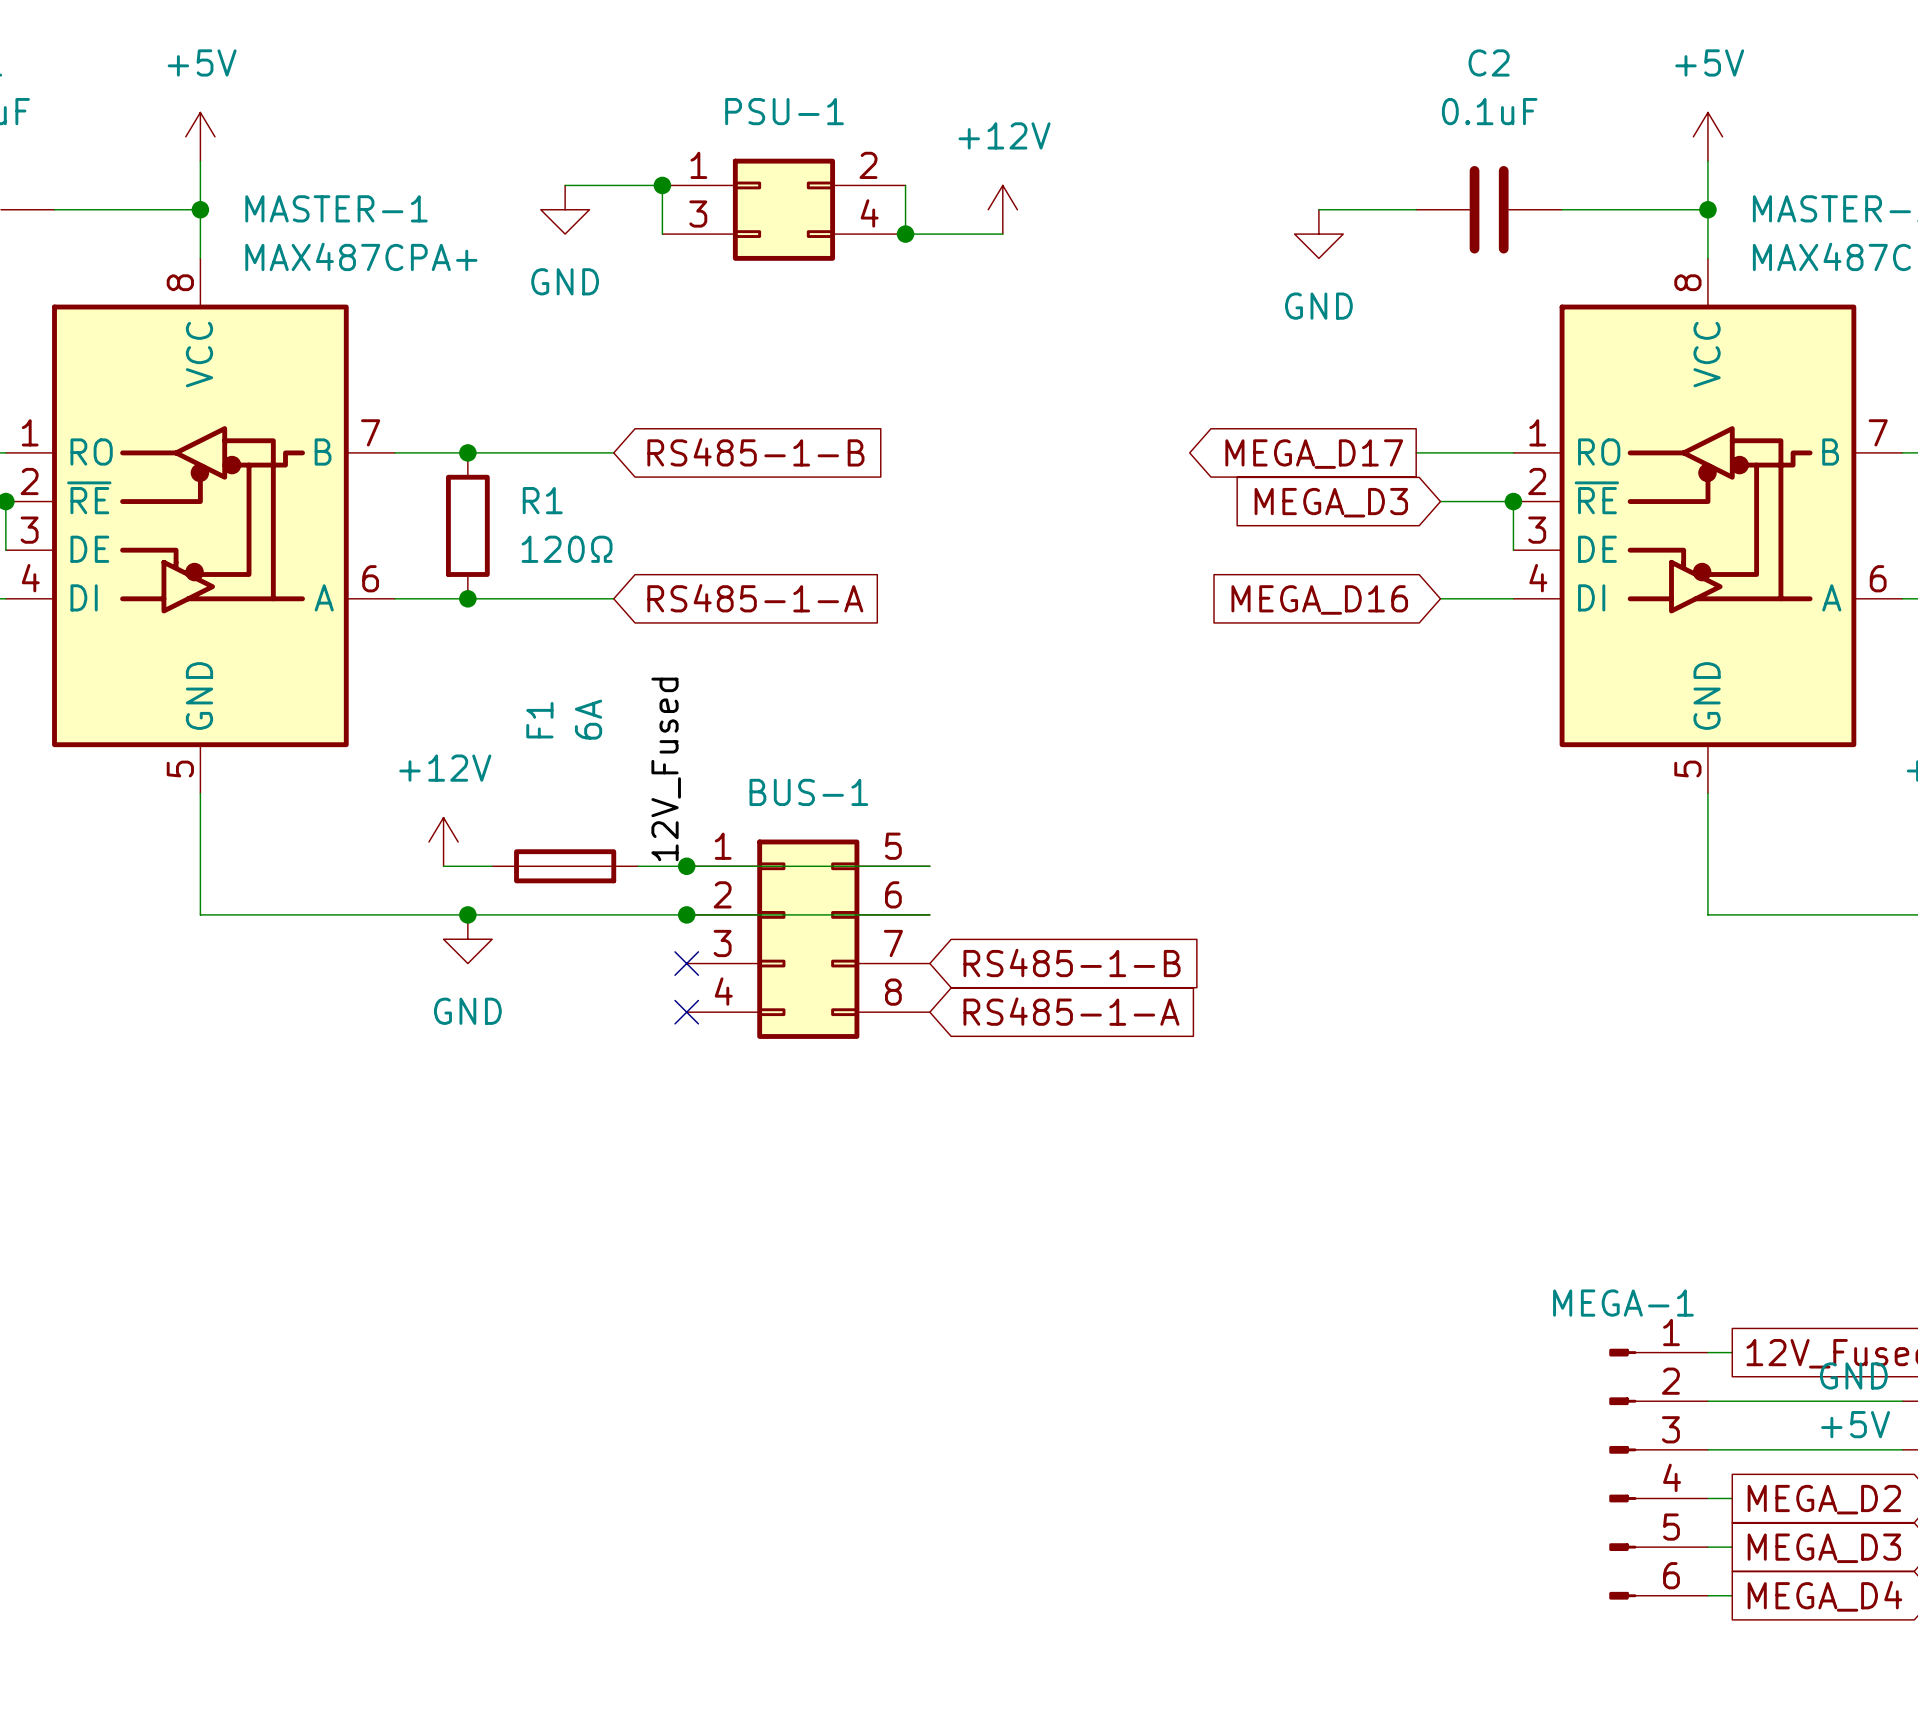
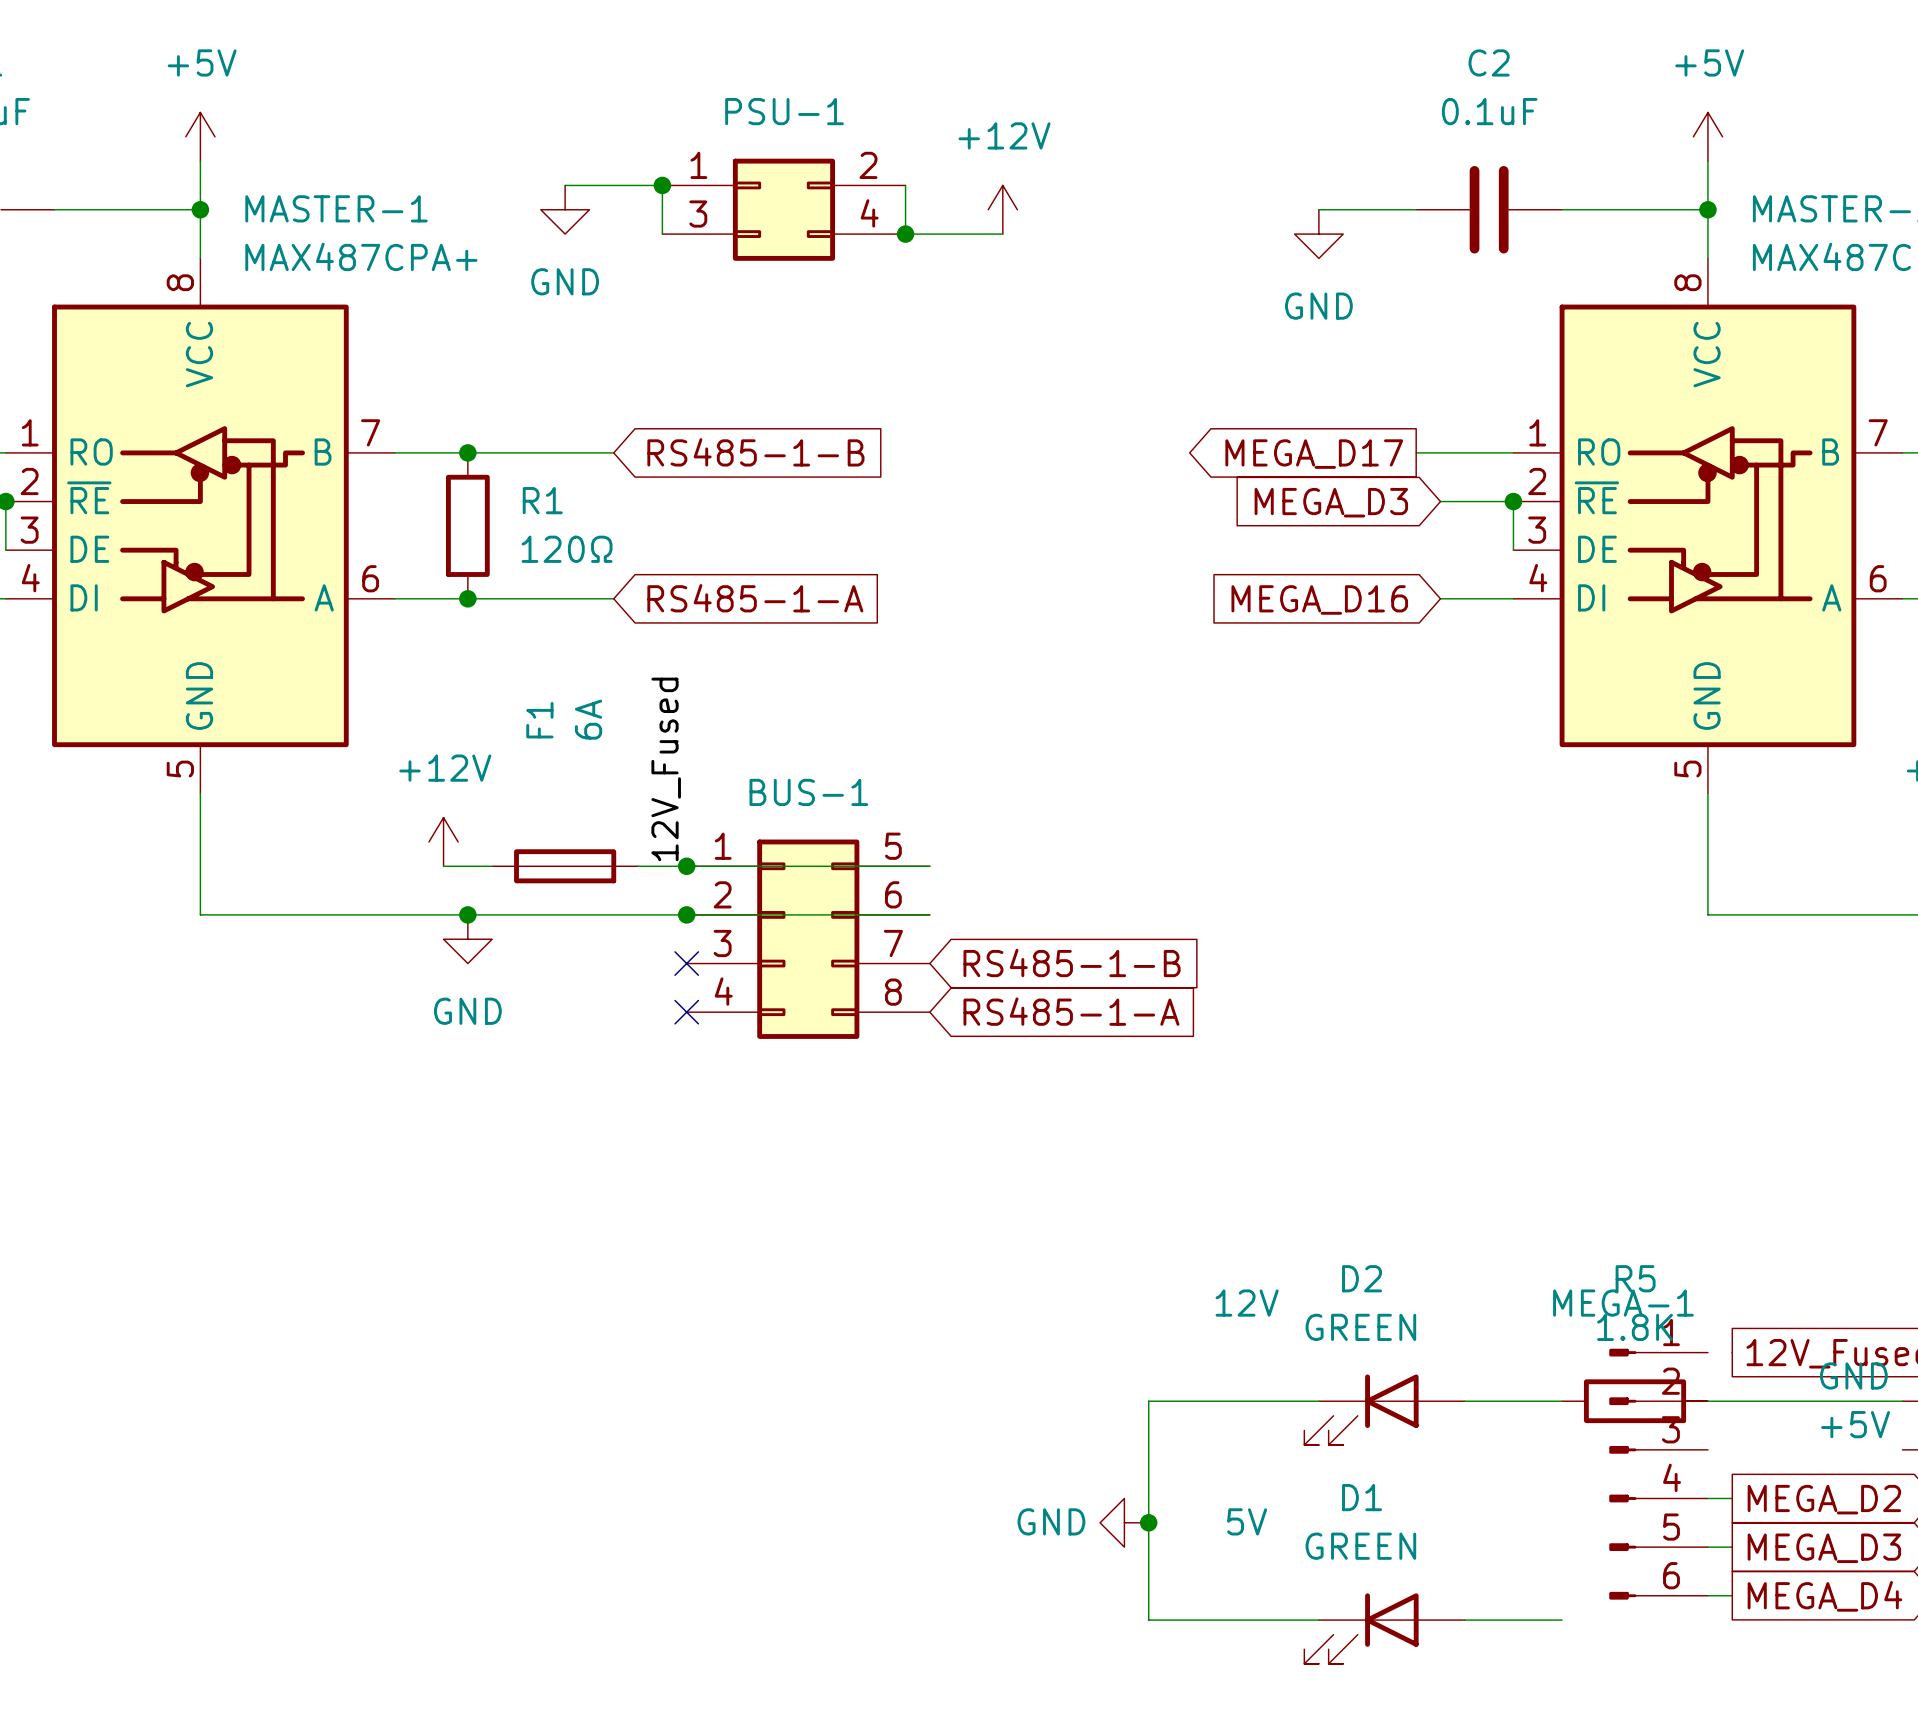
wire: (1707, 1352) (1732, 1352) -> none
wire: none -> (1318, 1401) (1148, 1401) (1148, 1620) (1318, 1620)
wire: none -> (1464, 1401) (1562, 1401)
R5: none -> 1.8K (1635, 1401)
D2: none -> GREEN (1384, 1409)
wire: (1707, 1449) (1902, 1449) -> none
power symbol: none -> GND (1124, 1522)
junction: none -> (1148, 1522)
wire: none -> (1464, 1620) (1562, 1620)
D1: none -> GREEN (1384, 1628)

